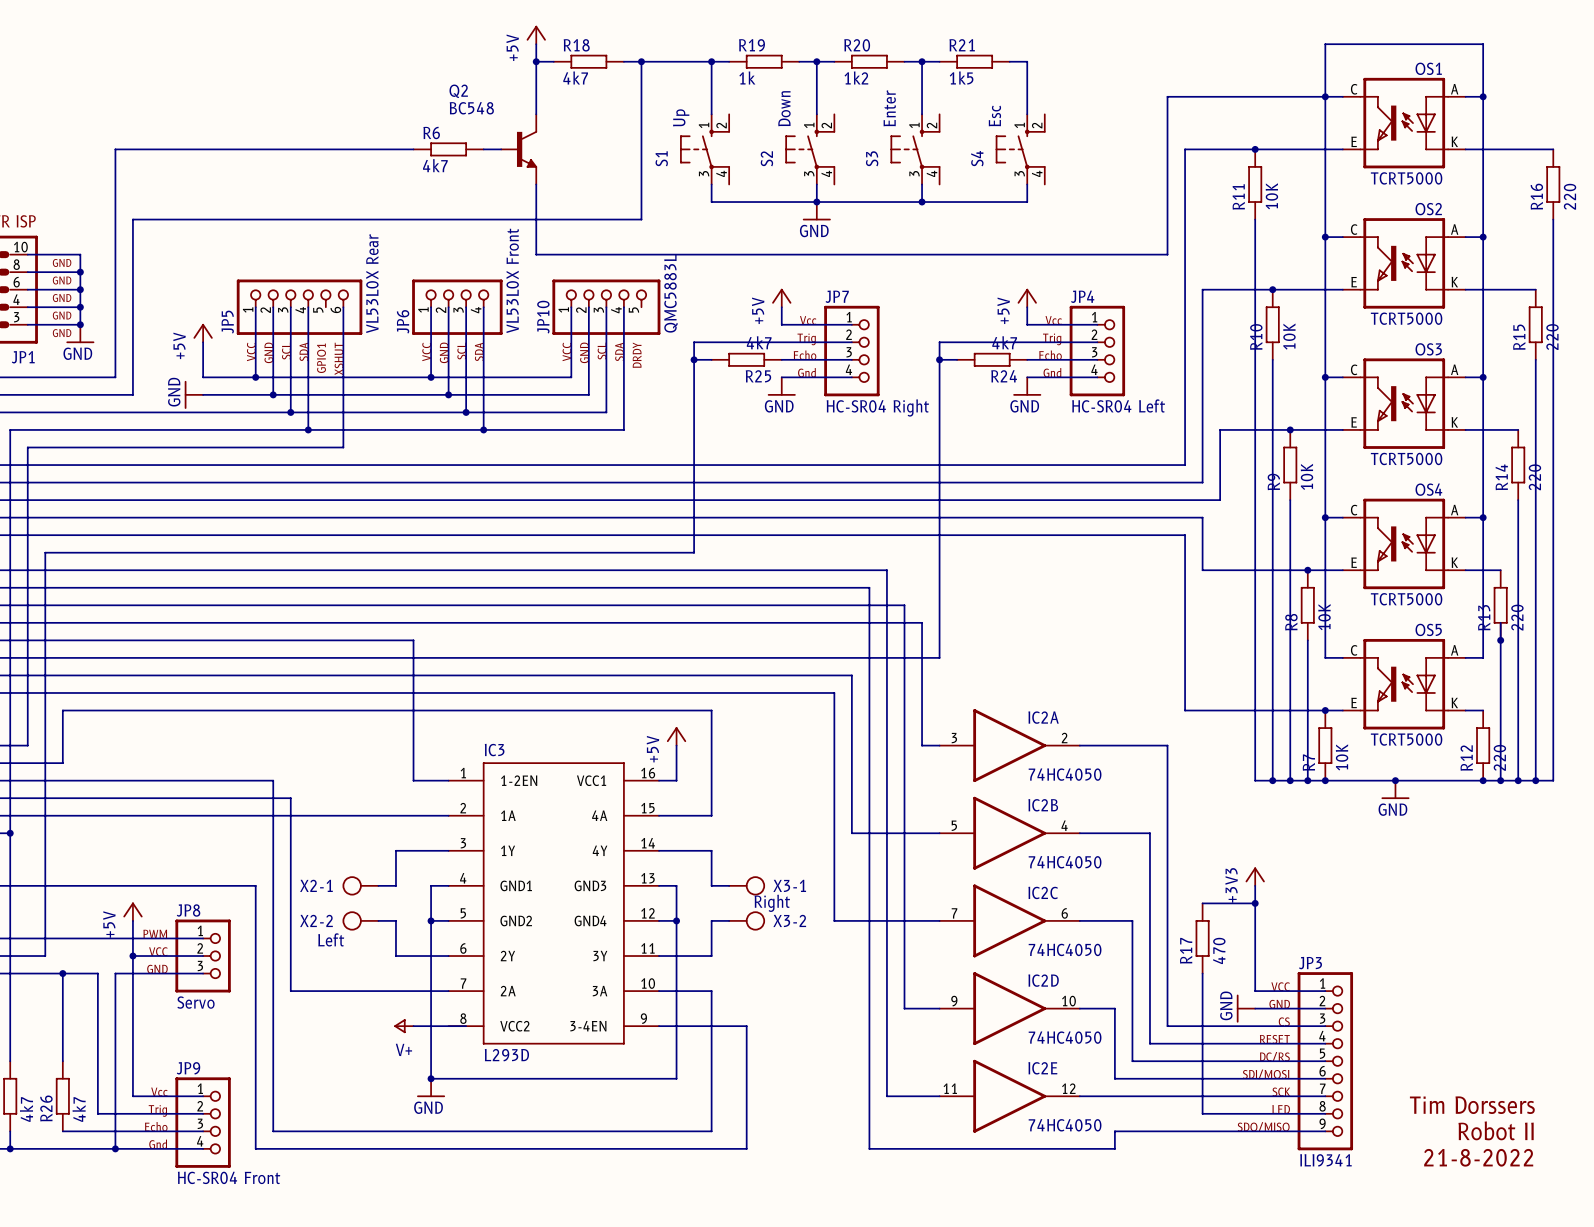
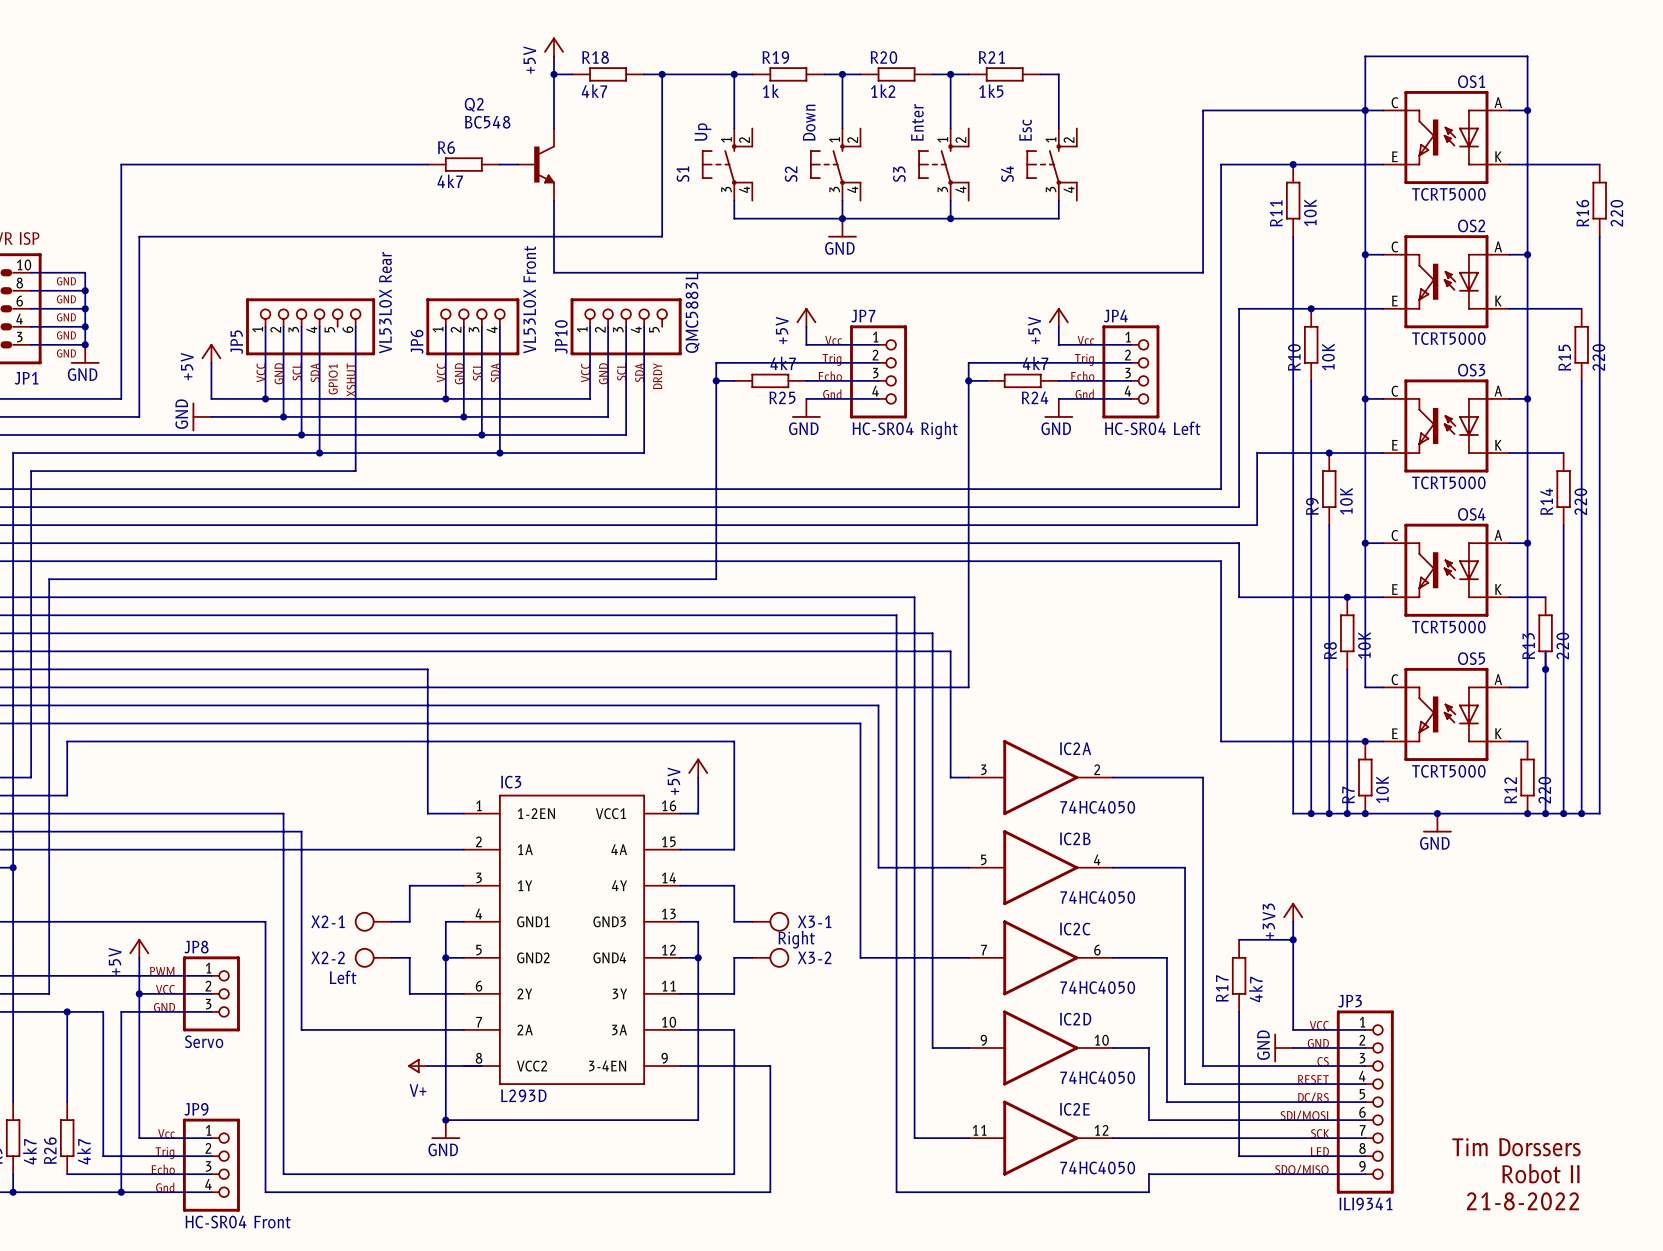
R17 value: 470 (1219, 950) -> 4k7 (1255, 989)

